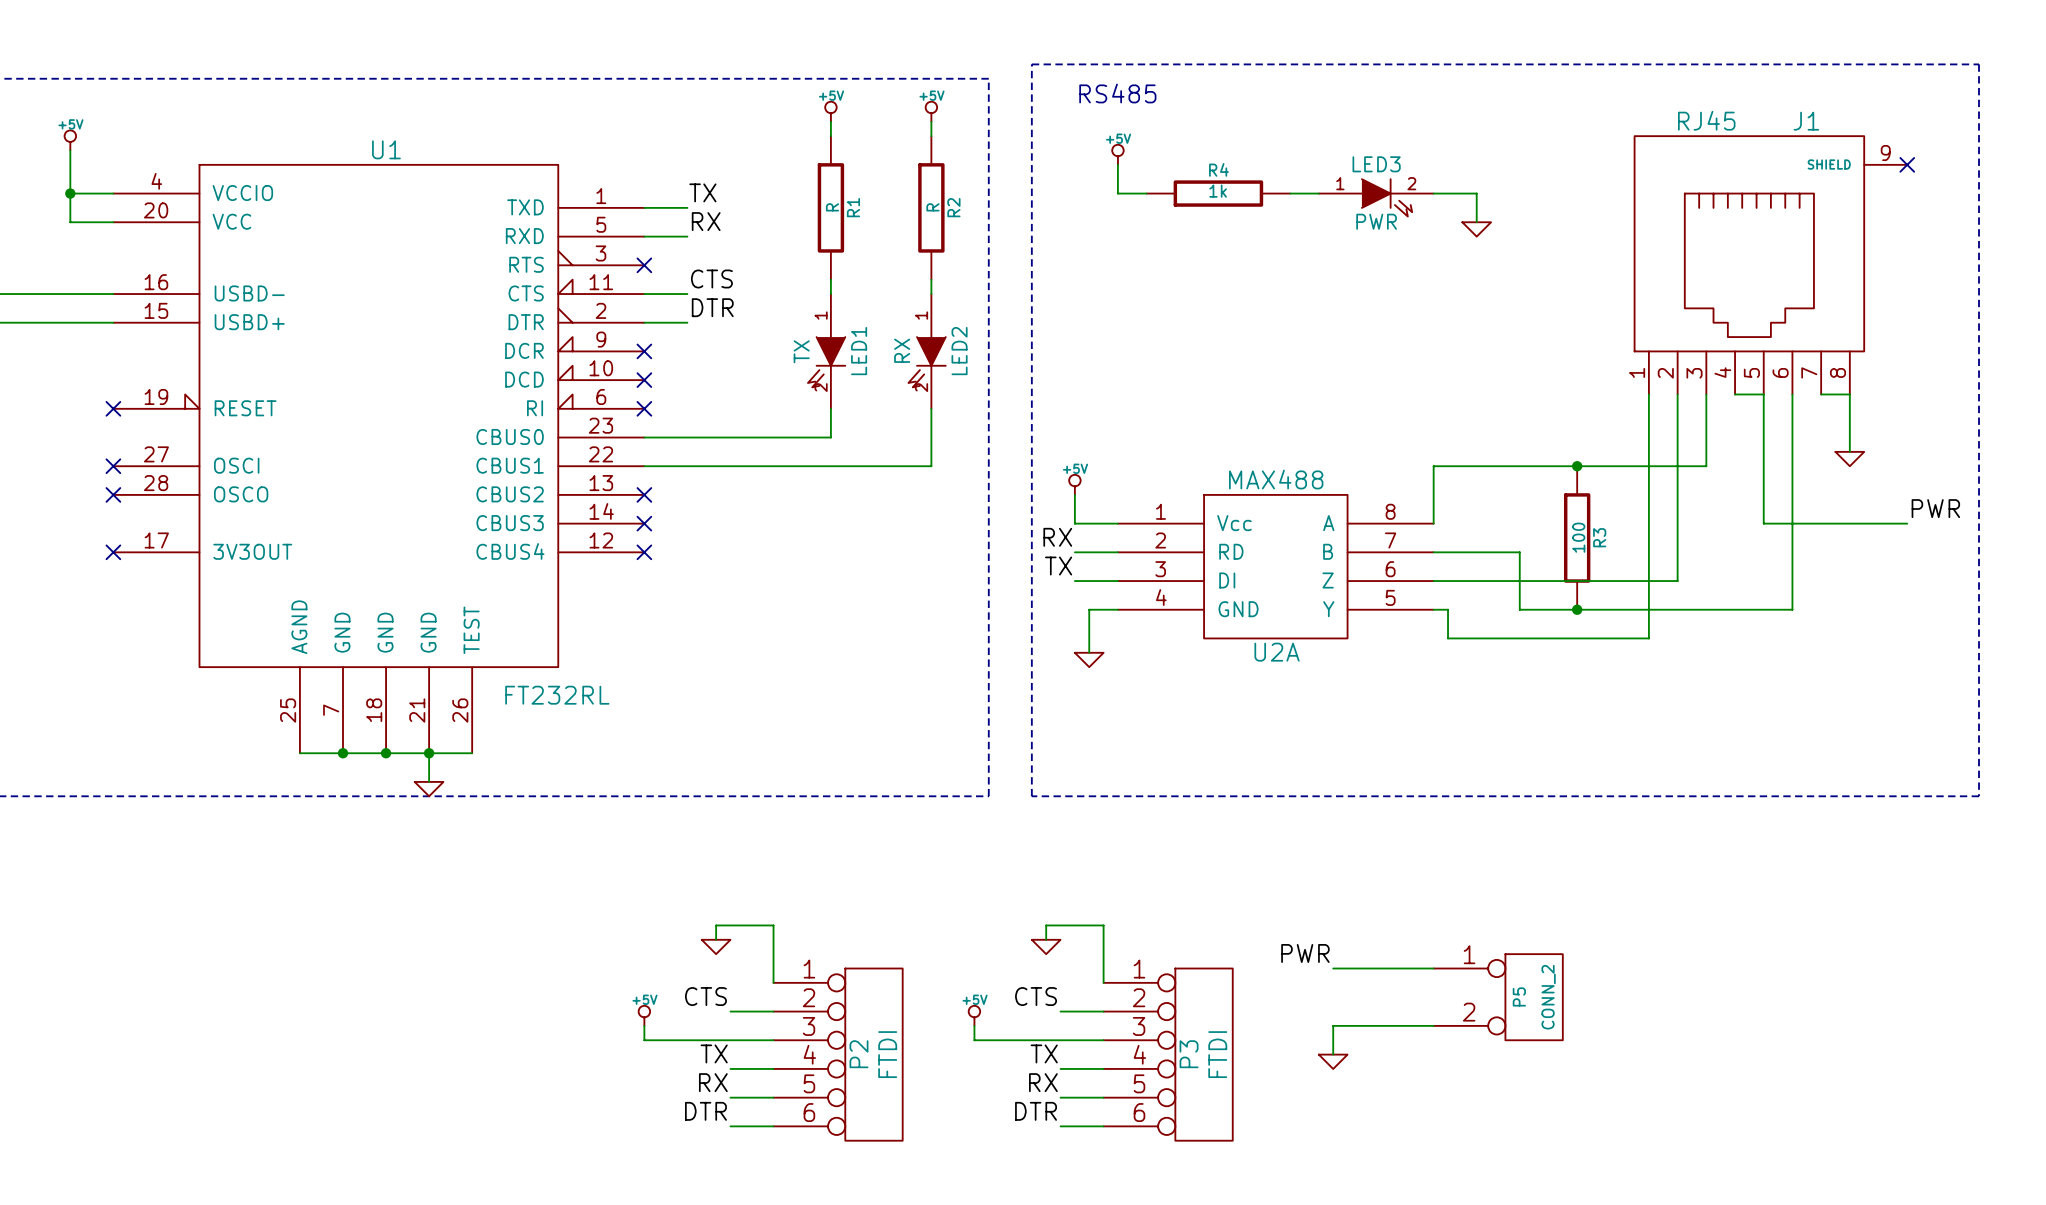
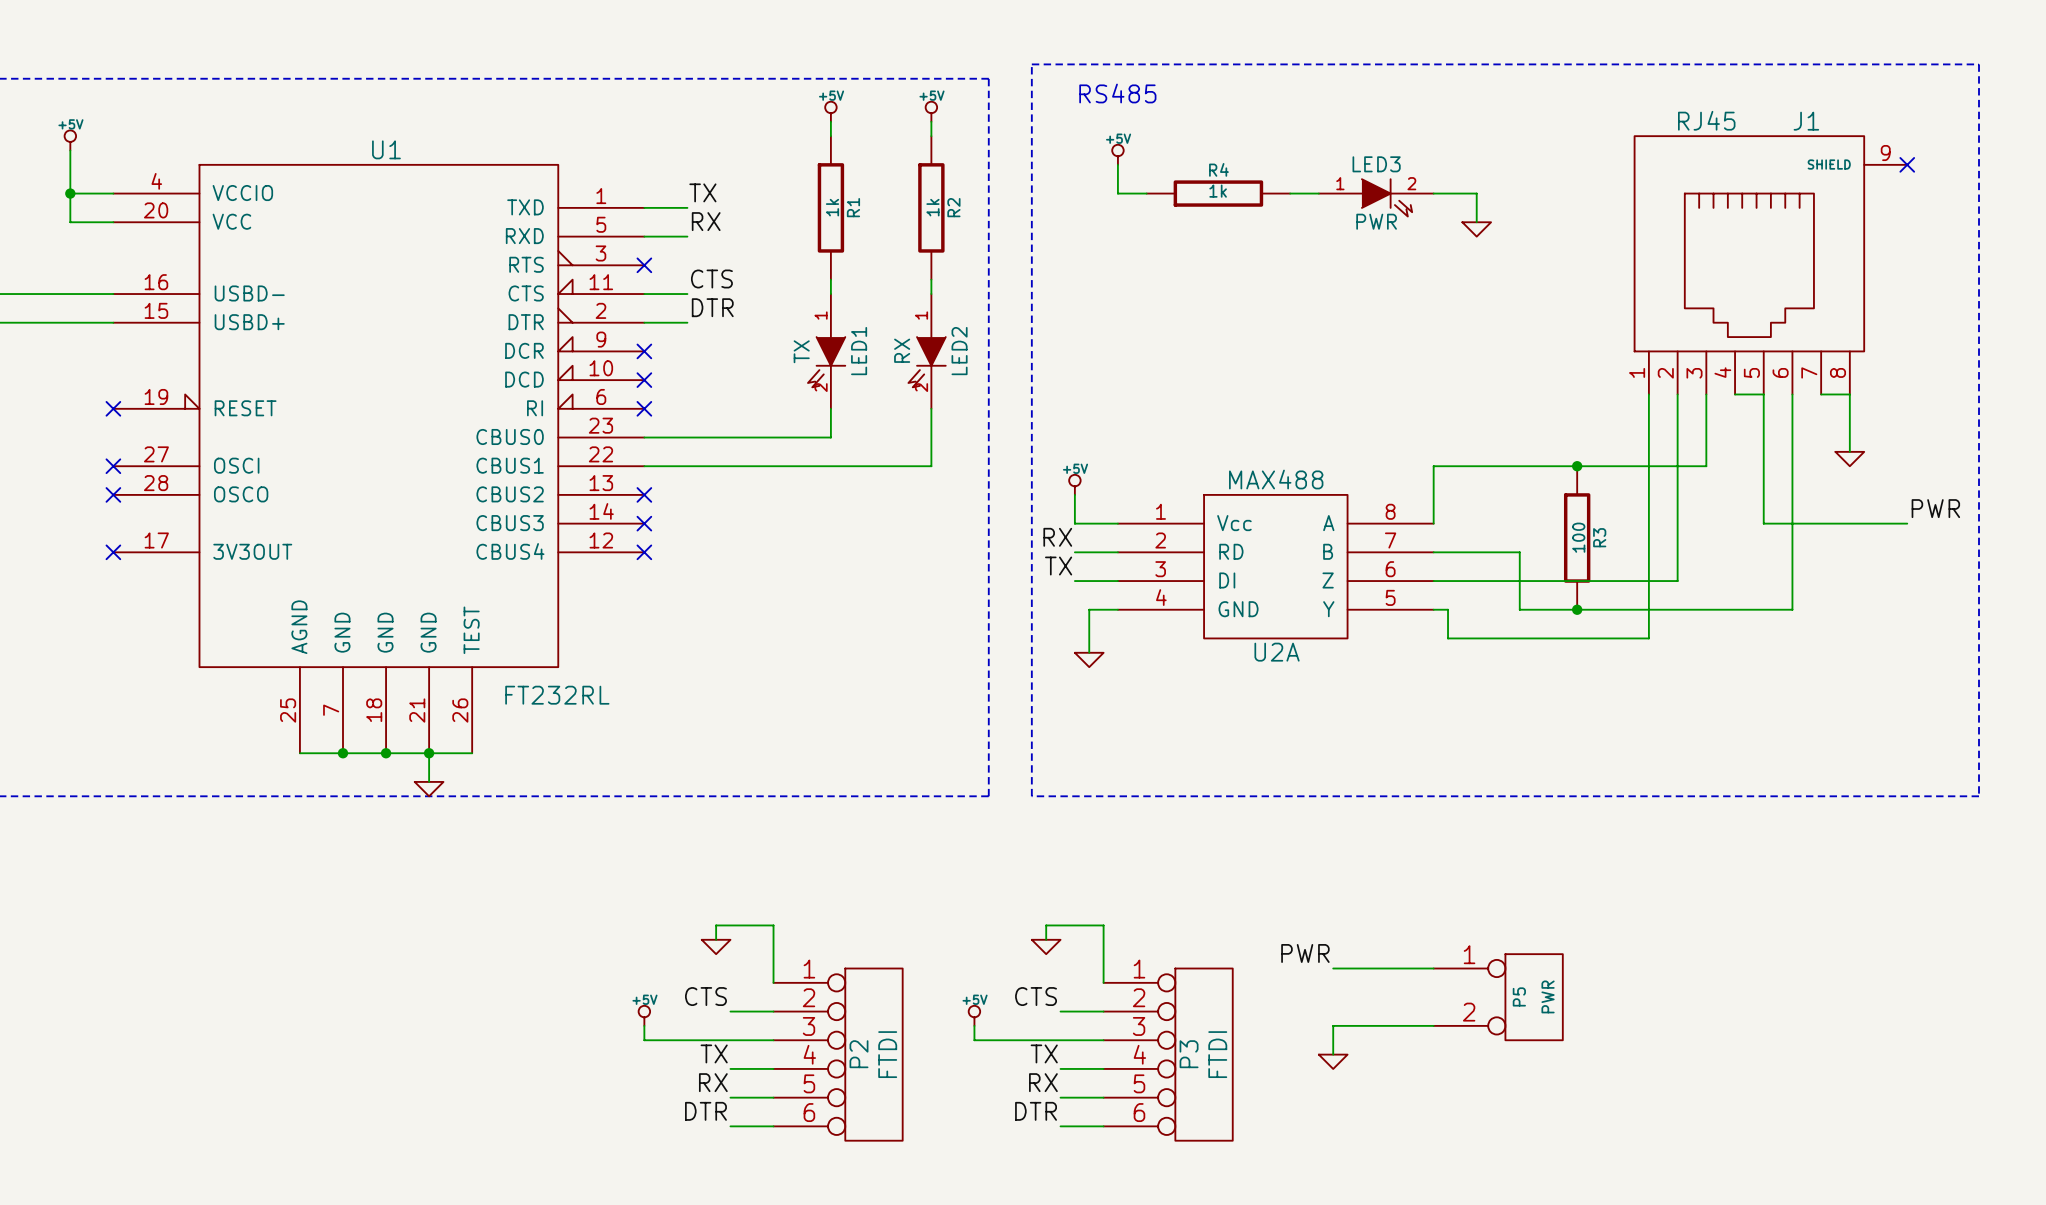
R1 value: R (832, 207) -> 1k (832, 207)
R2 value: R (932, 207) -> 1k (932, 207)
P5 value: CONN_2 (1548, 997) -> PWR (1548, 996)

